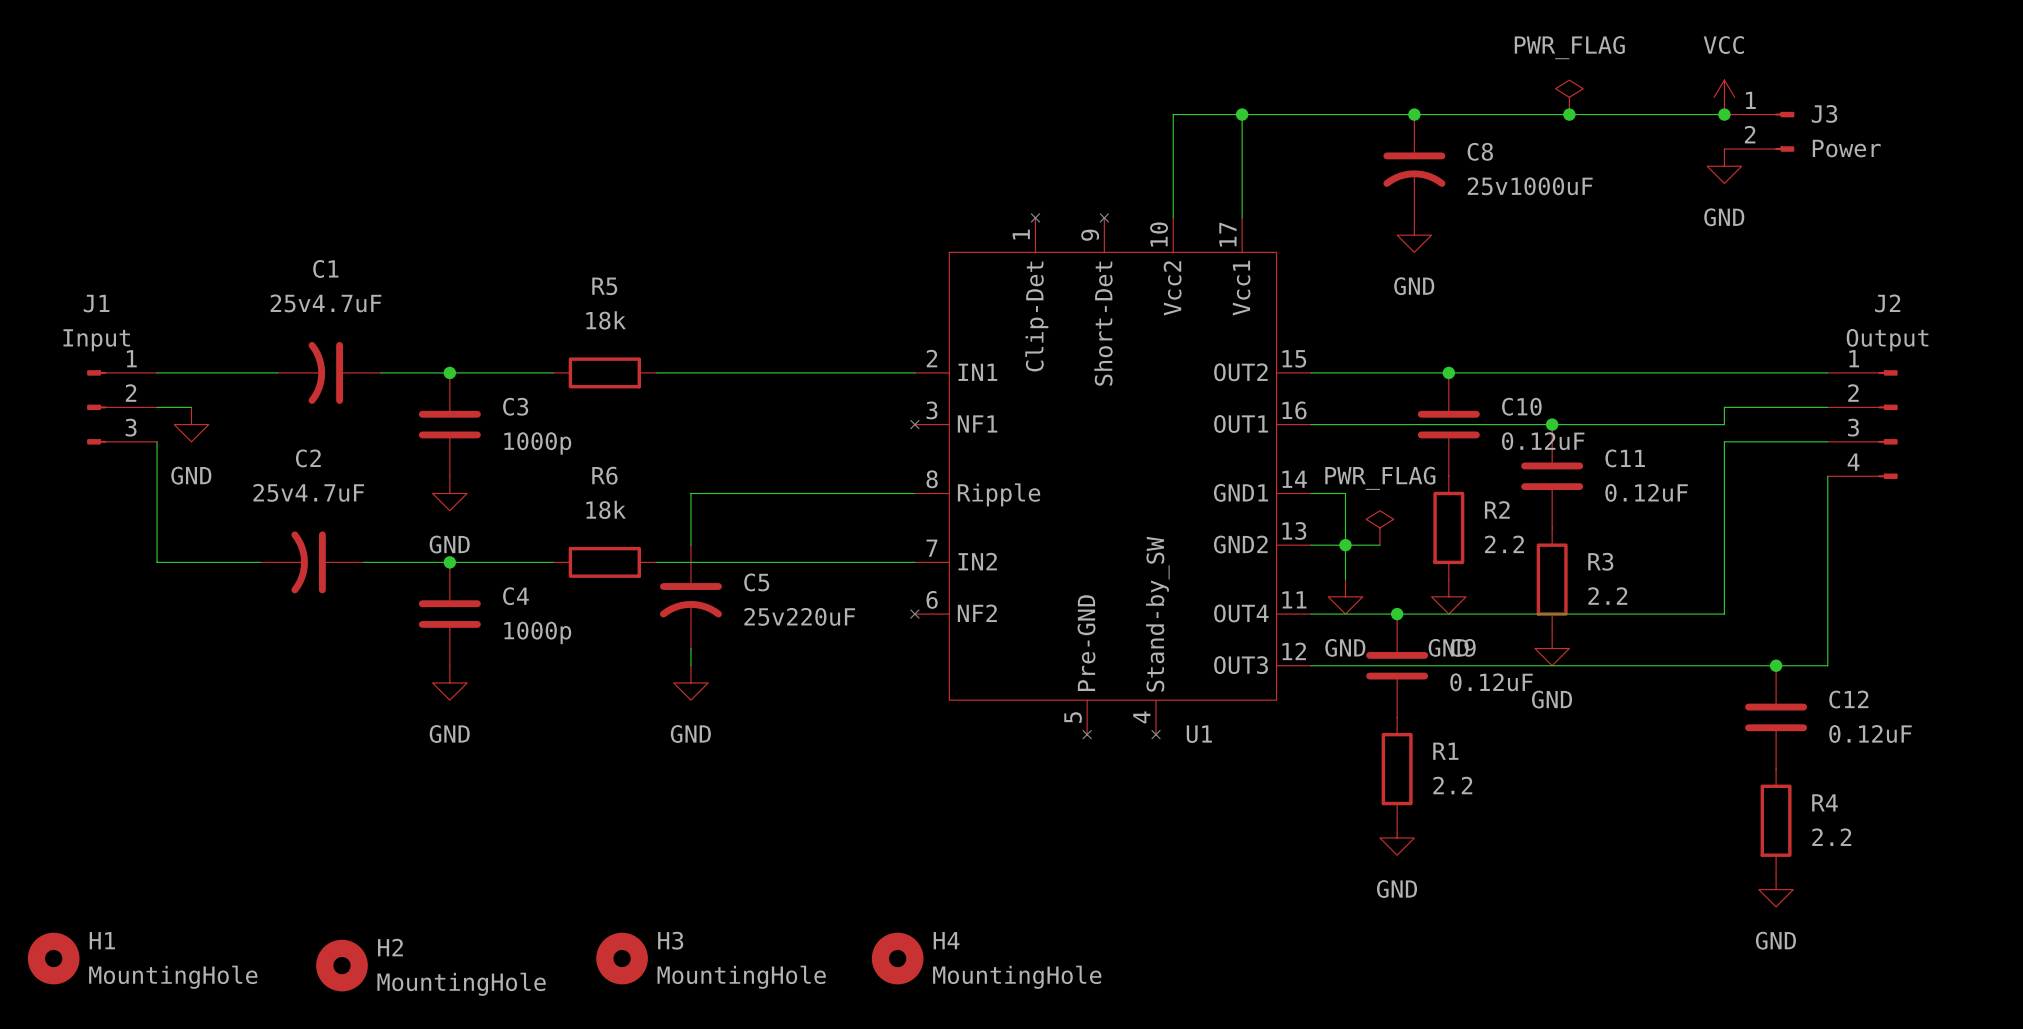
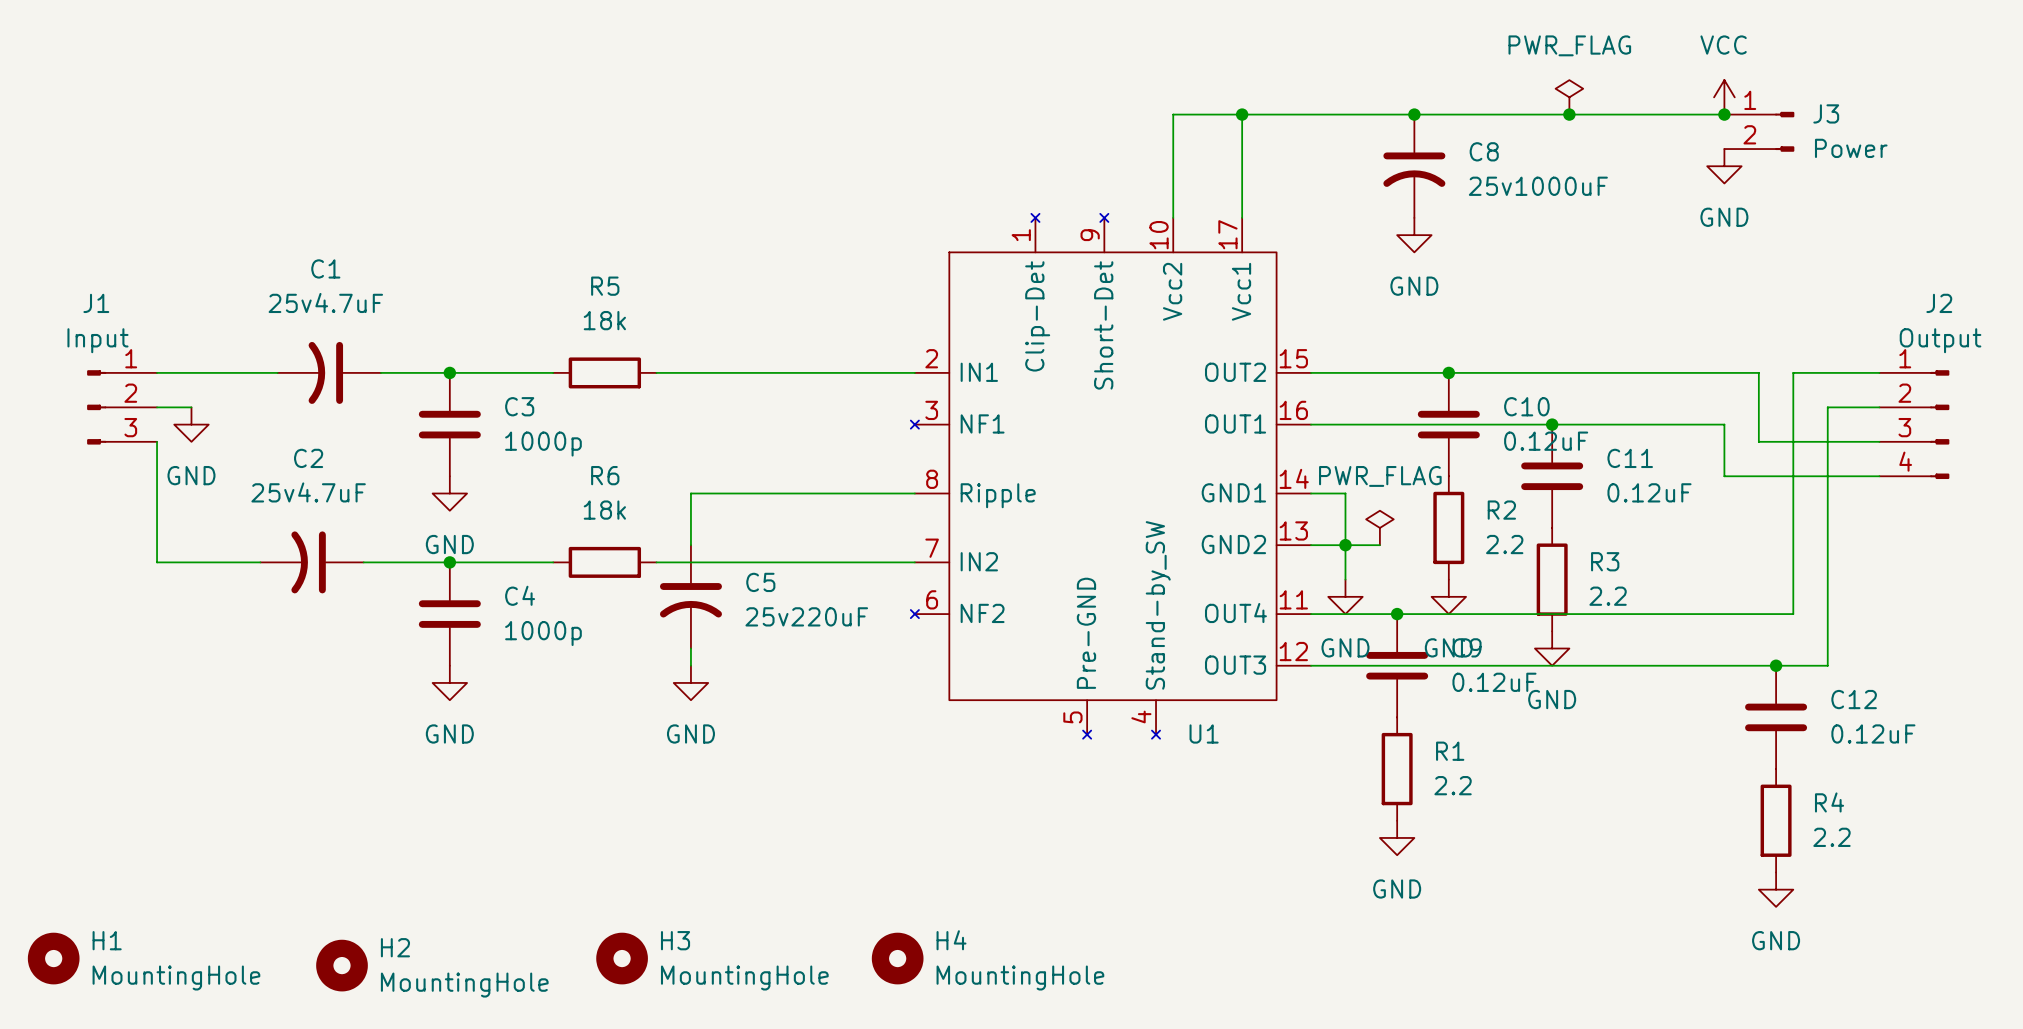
wire: (1758, 372) (1793, 372) -> (1758, 372) (1758, 441)
wire: (1827, 407) (1724, 407) (1724, 424) -> none
wire: none -> (1879, 407) (1827, 407) (1827, 476)
J2 position: (1862, 424) -> (1914, 424)
wire: (1724, 441) (1758, 441) -> (1724, 441) (1724, 424)
wire: (1724, 476) (1724, 614) -> (1793, 372) (1793, 614) (1724, 614)
wire: none -> (1724, 476) (1879, 476)

